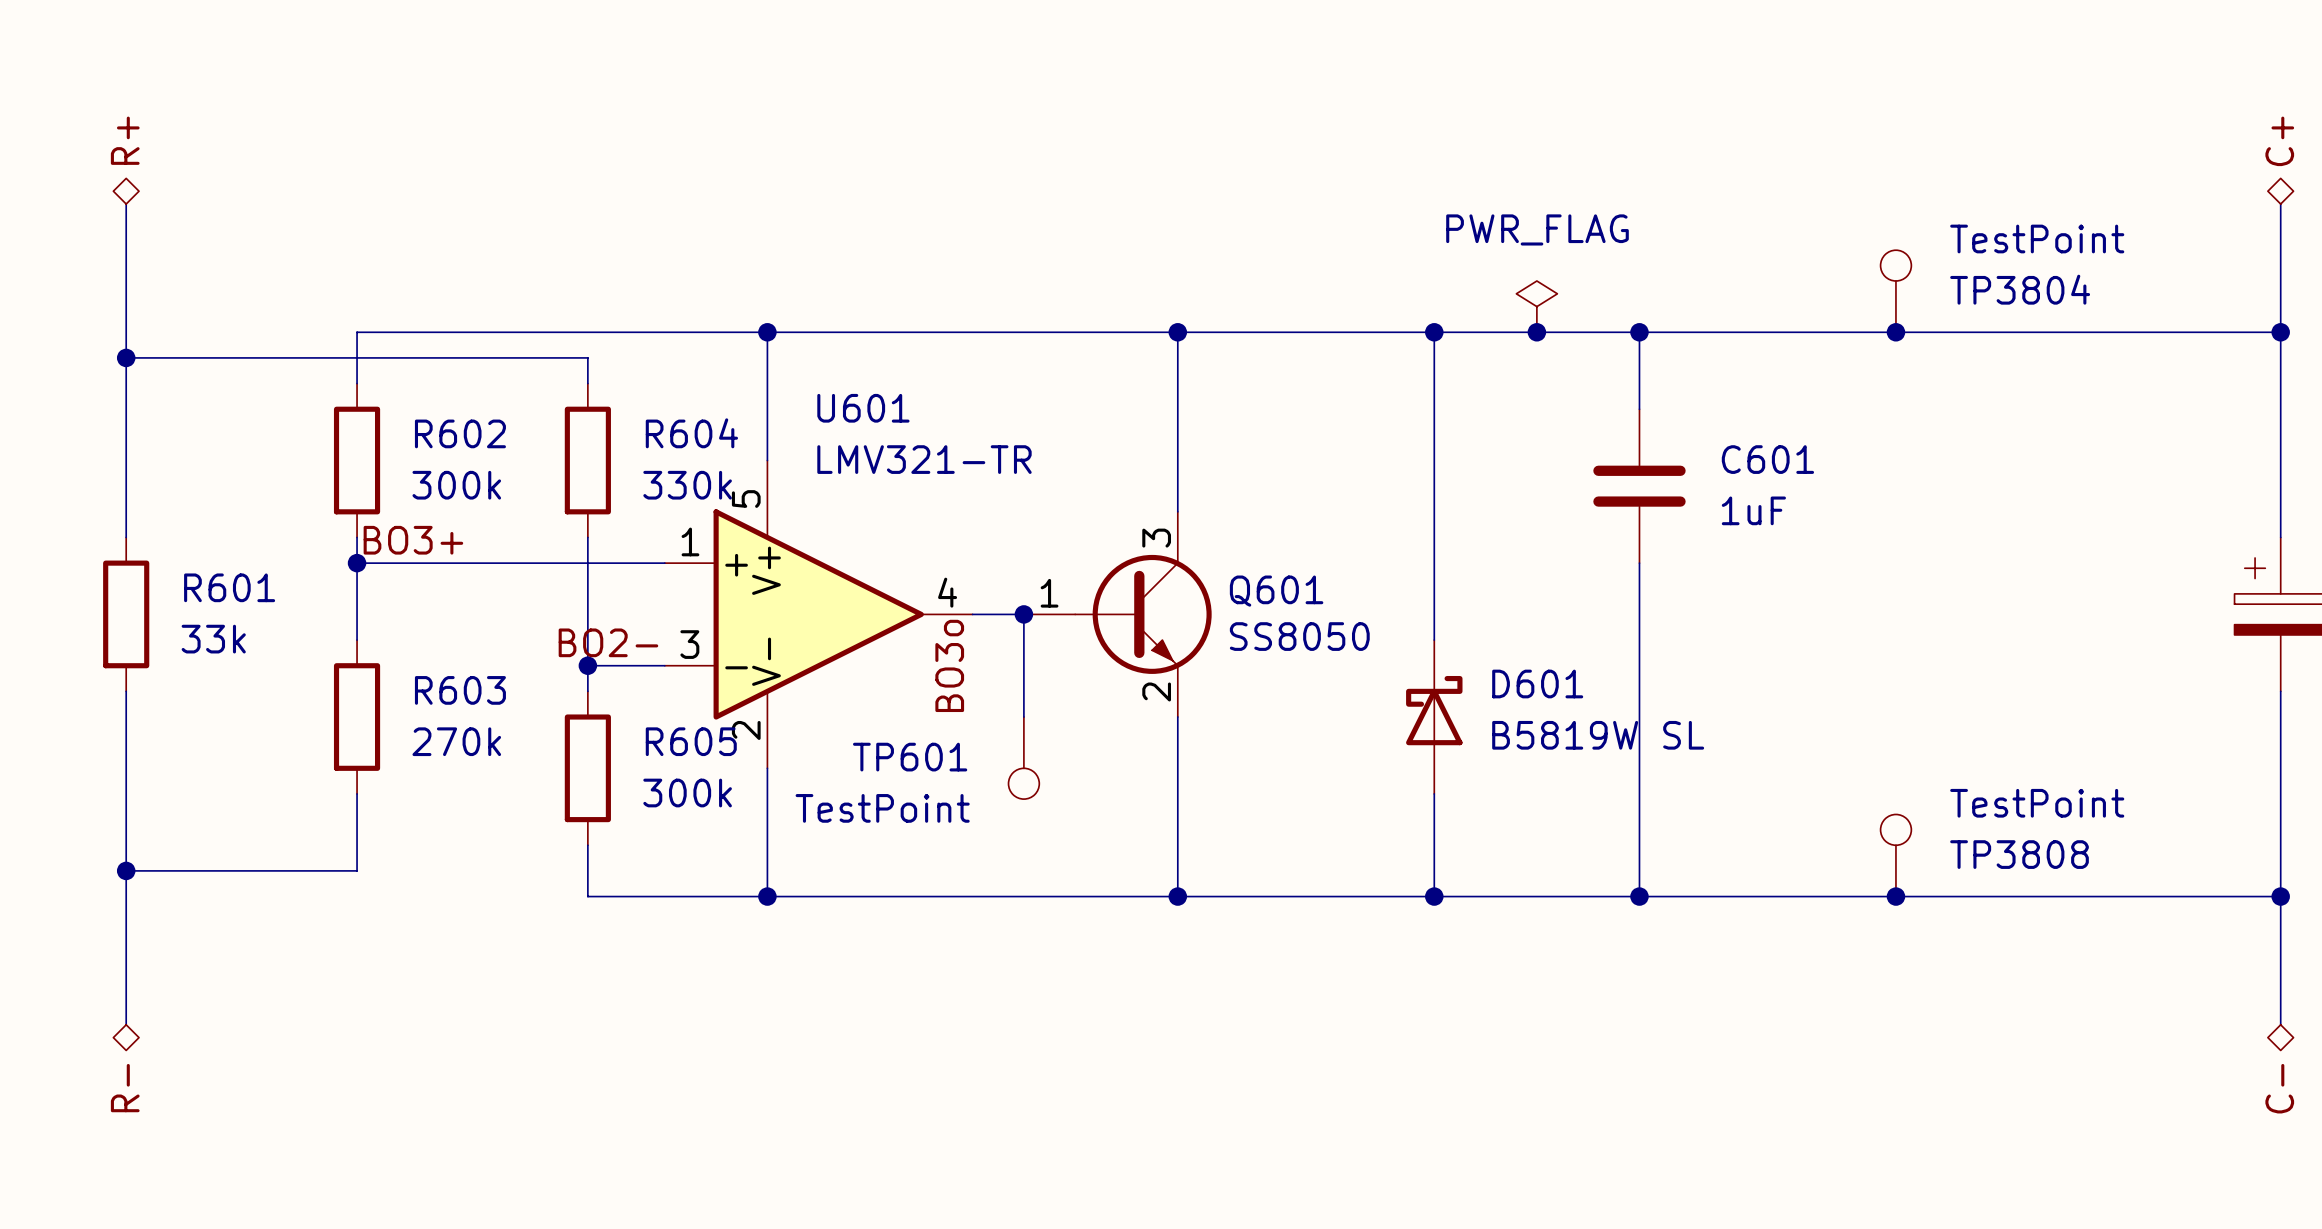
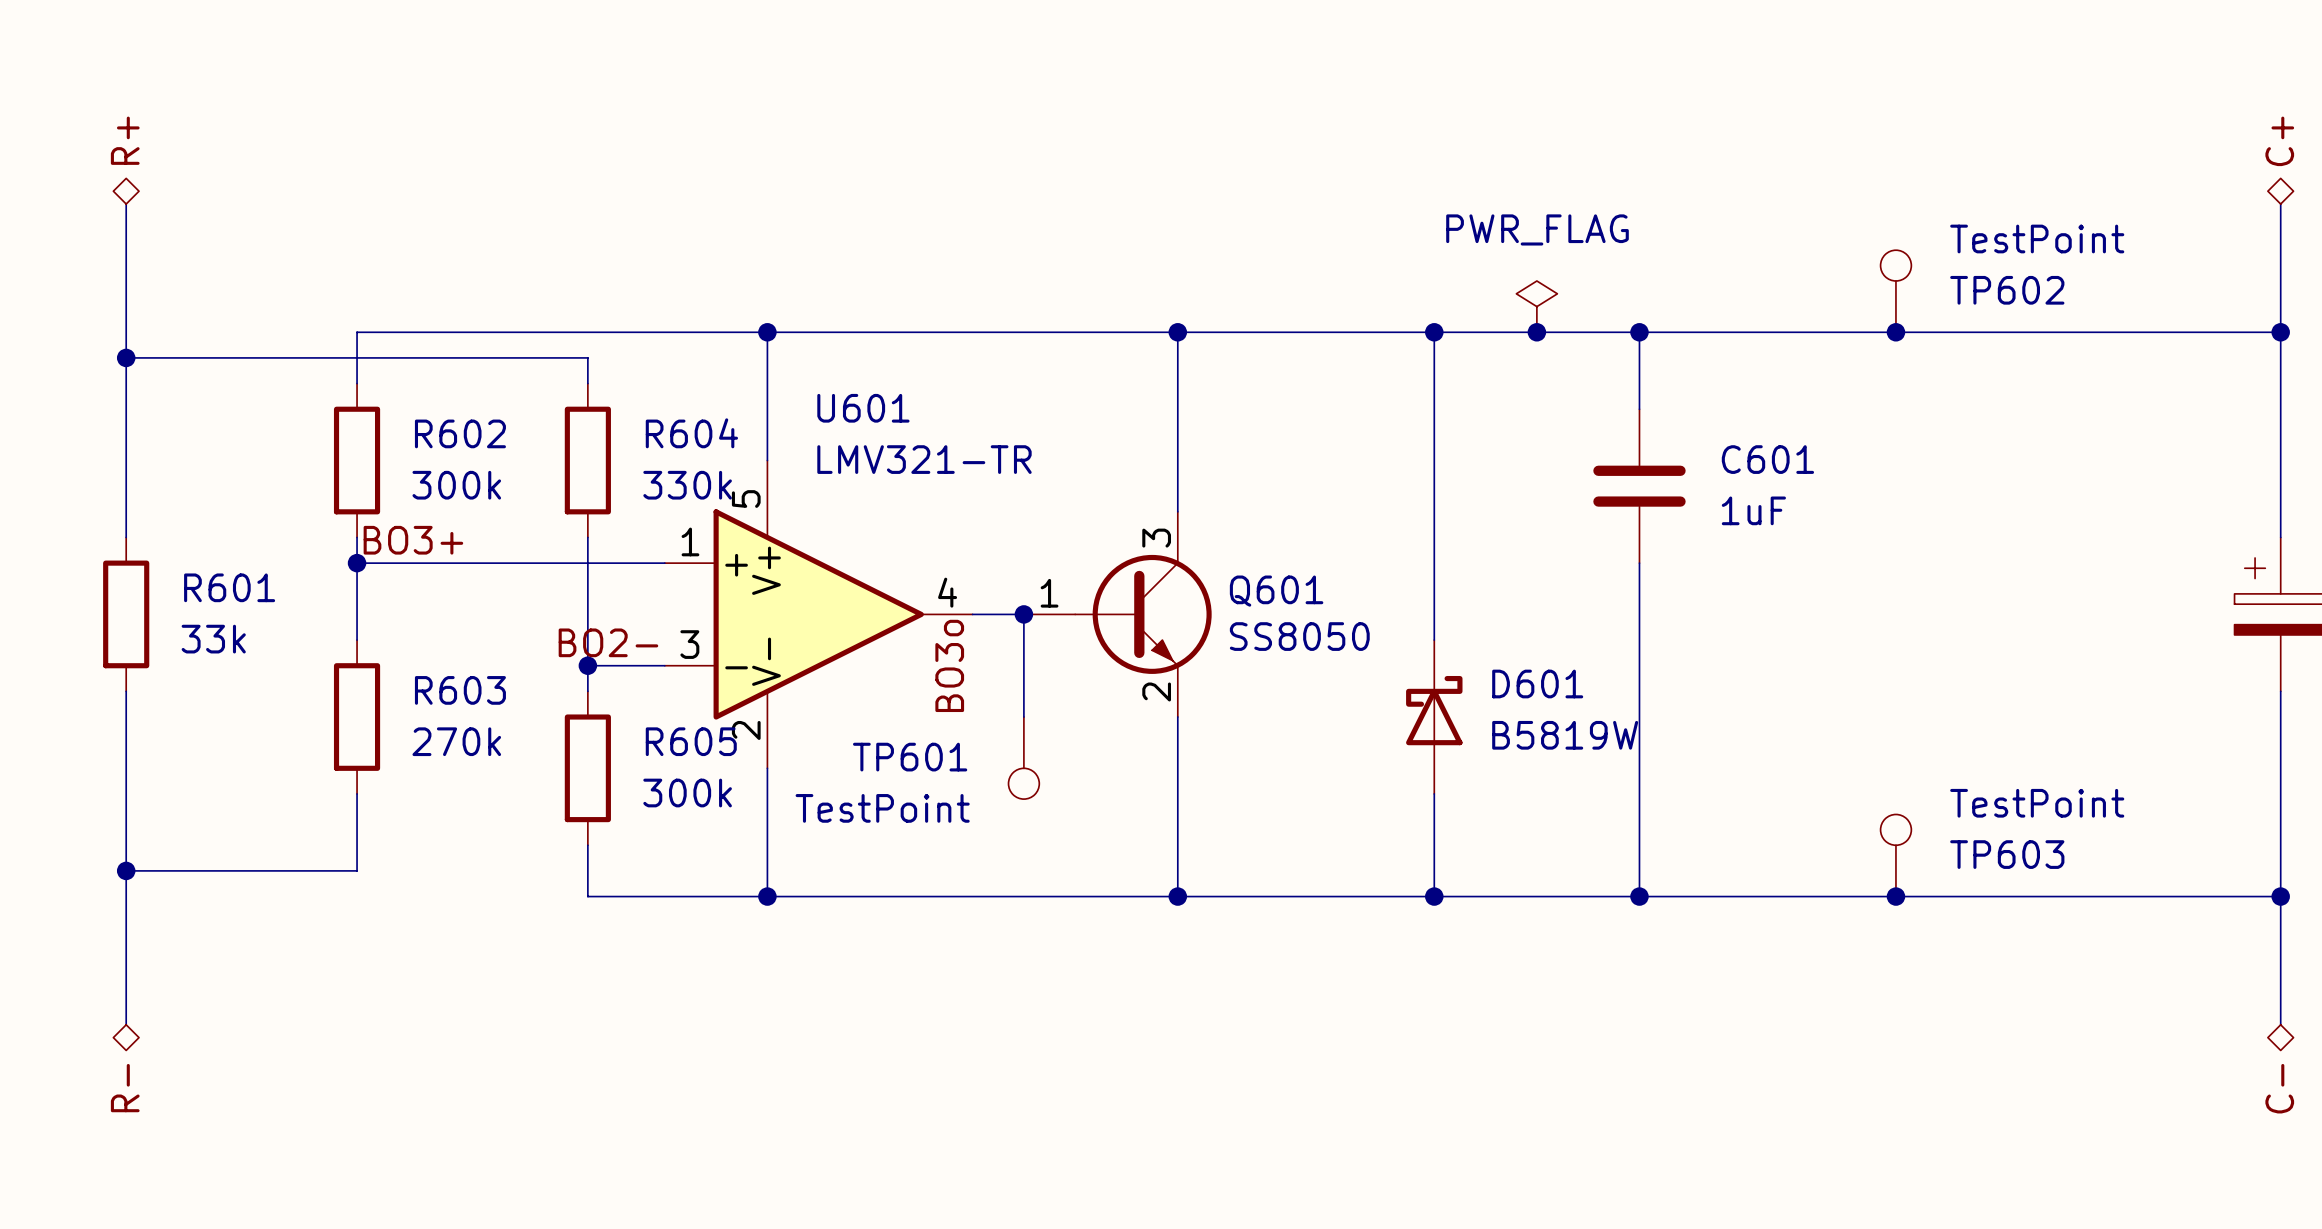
TP3804 name: TP3804 (2020, 289) -> TP602 (2007, 290)
D601 value: B5819W SL (1598, 735) -> B5819W (1565, 735)
TP3808 name: TP3808 (2019, 854) -> TP603 (2007, 854)

